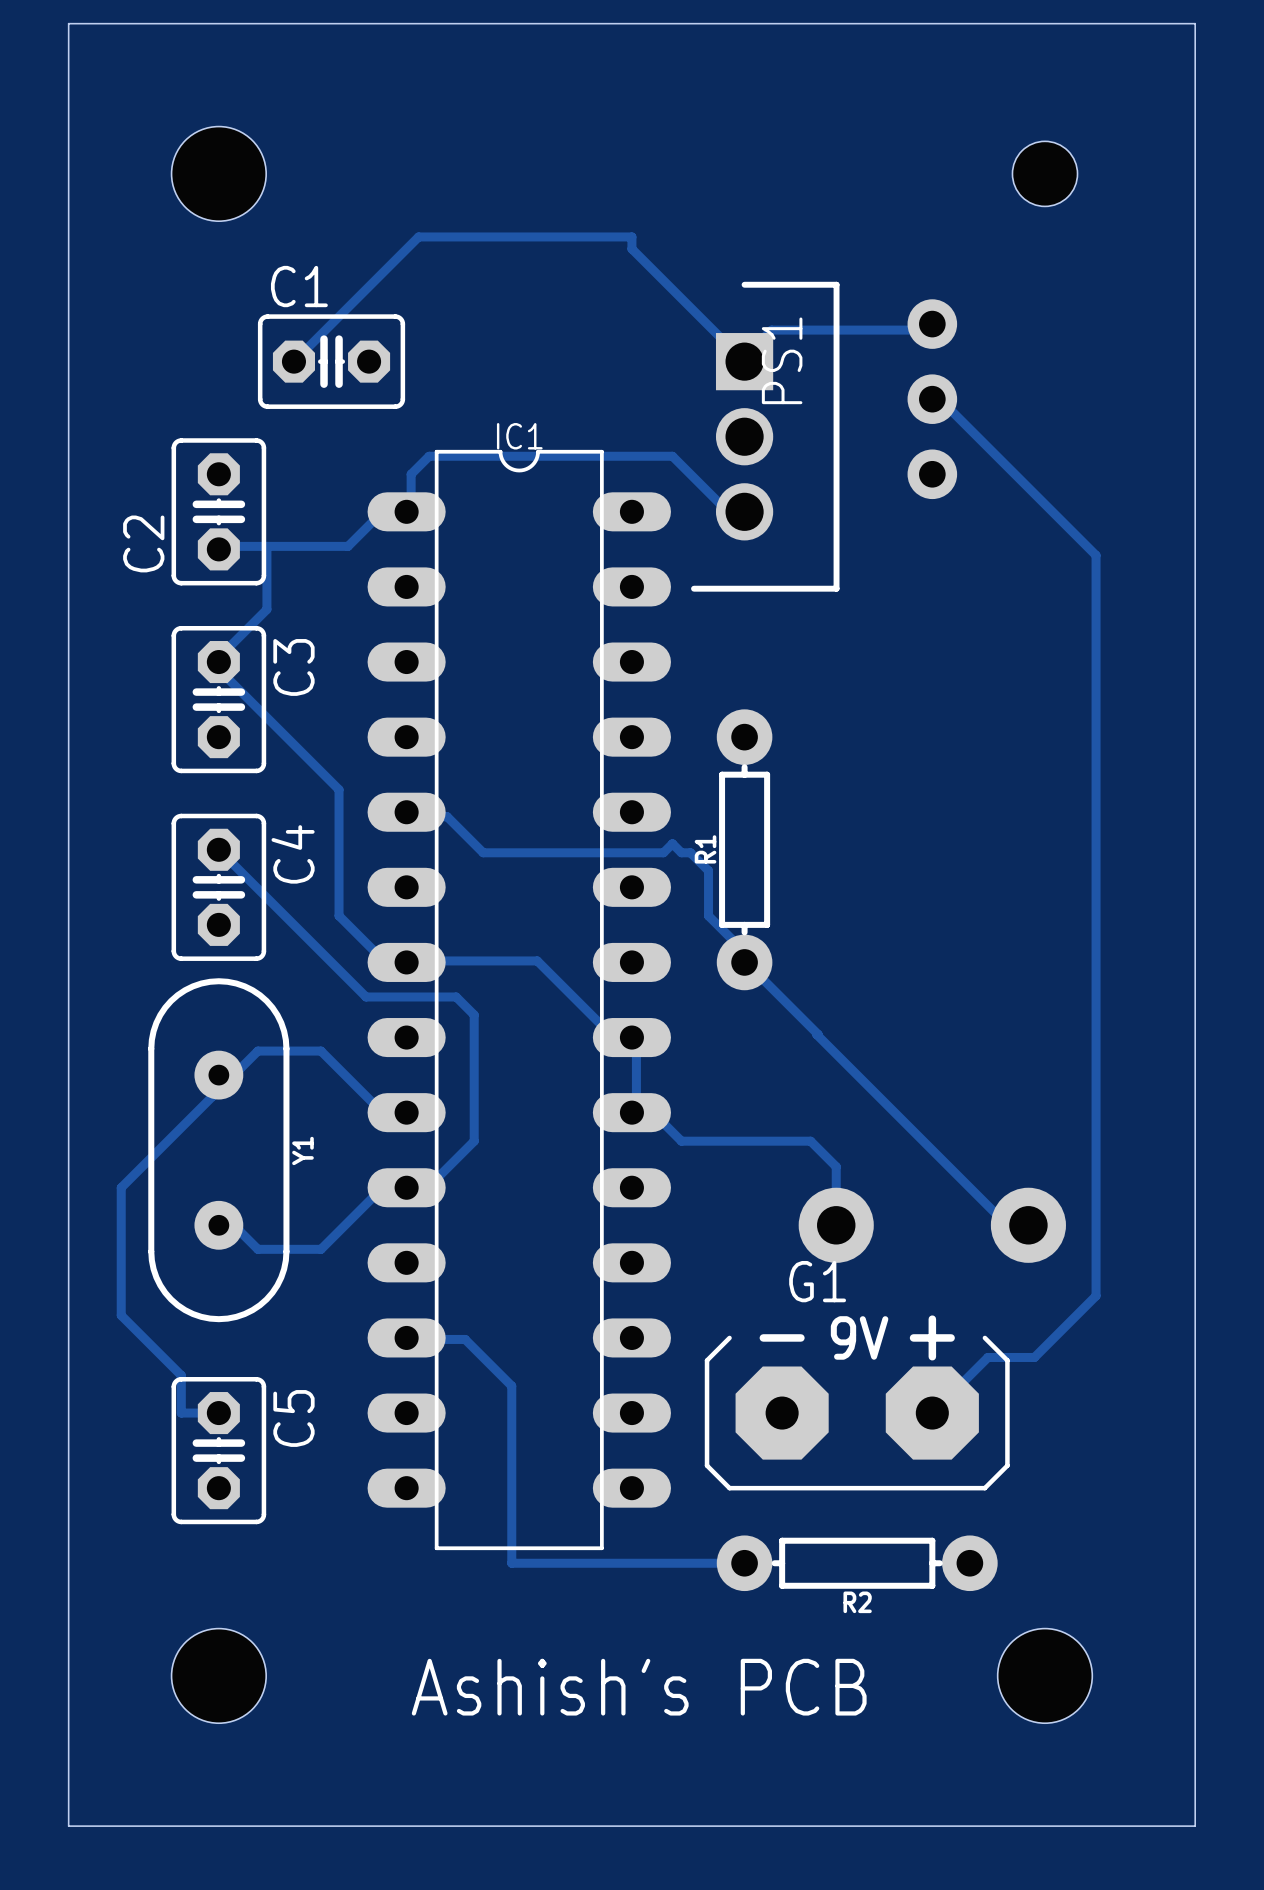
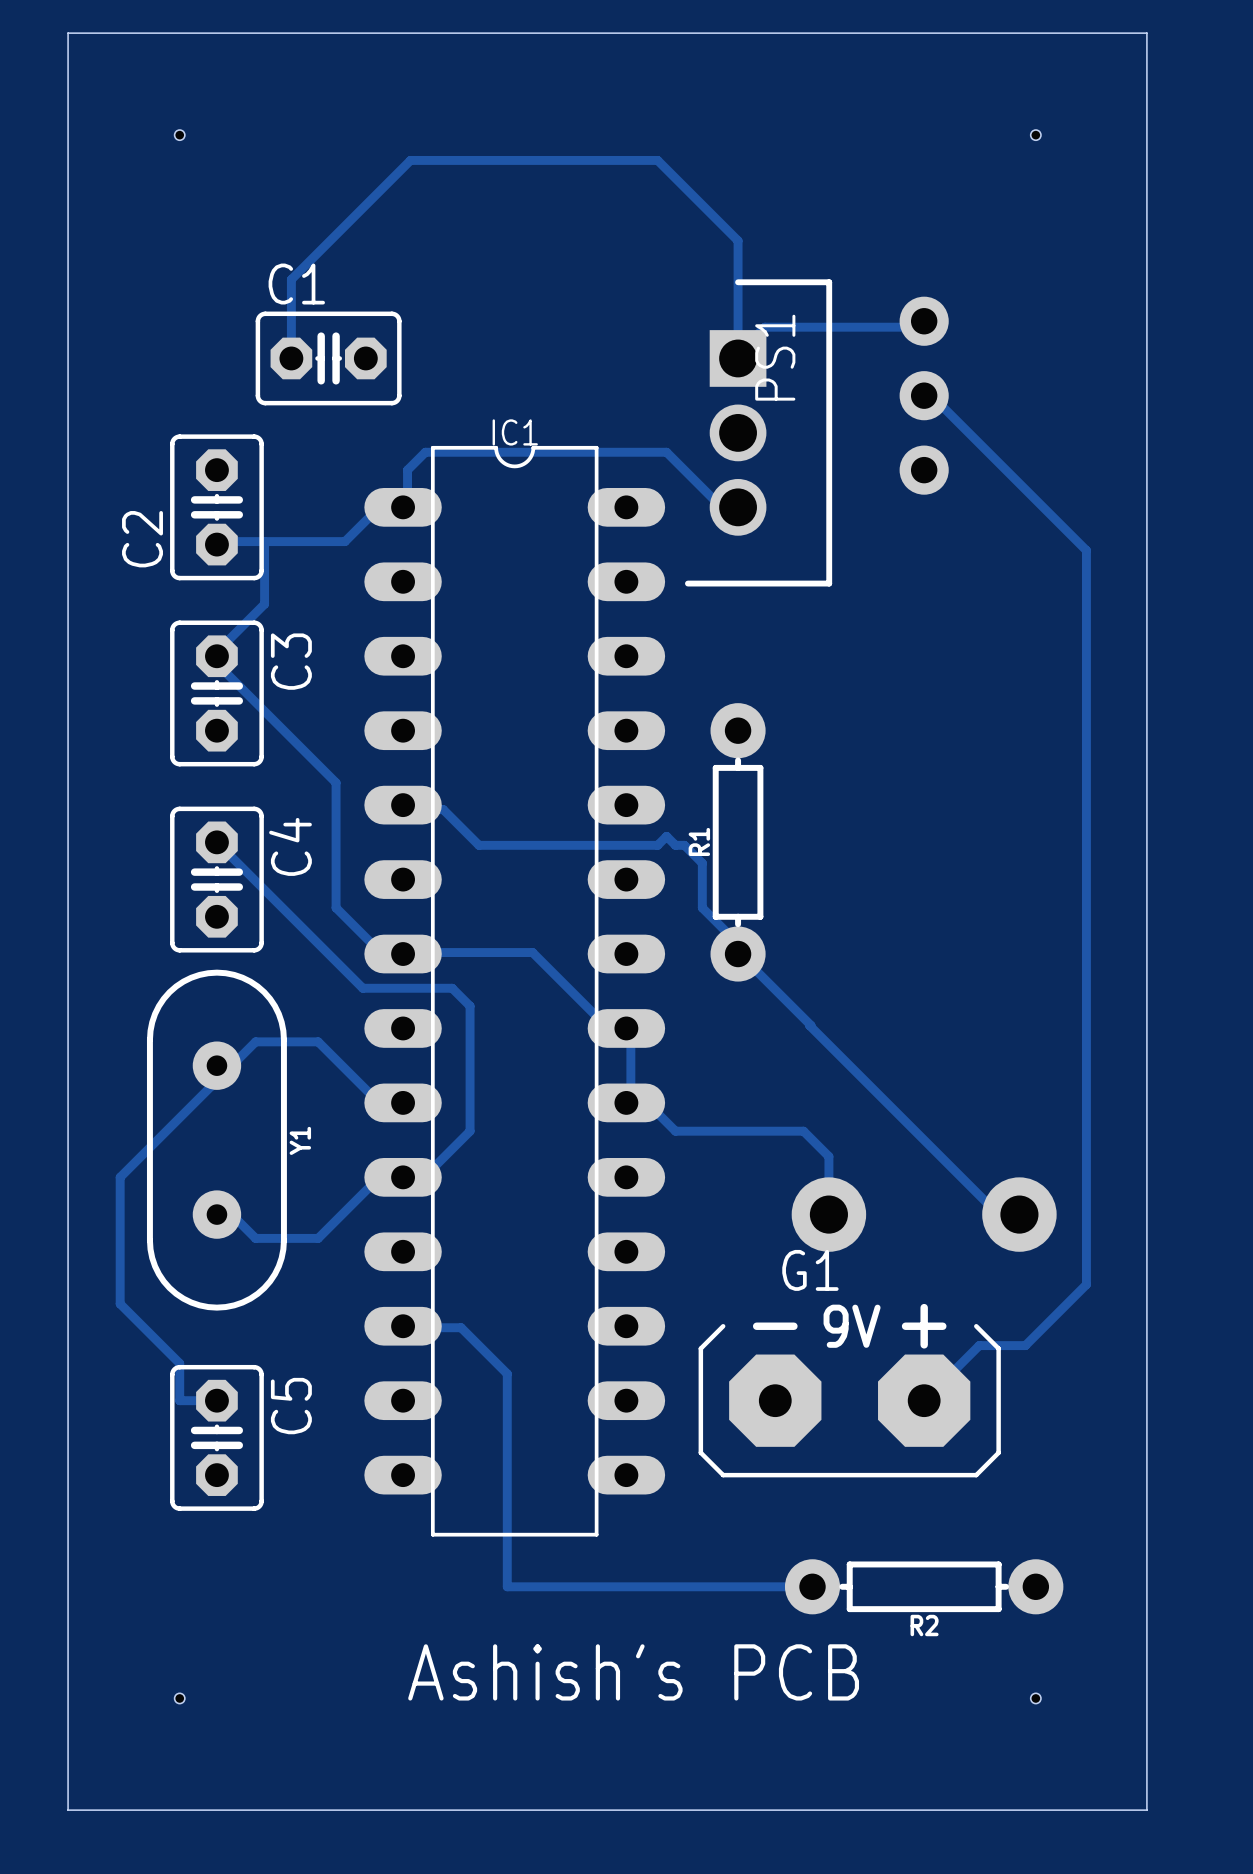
board edge: (68, 33) (68, 23) (1195, 23) (1195, 1826) (1157, 1826) -> (68, 33) (1146, 33) (1146, 1810)
hole: none -> (179, 135)
hole: none -> (1035, 135)
hole: (218, 173) -> none
hole: (1044, 173) -> none
track: (293, 361) (418, 236) (631, 236) (631, 248) (744, 361) -> (291, 358) (291, 279) (410, 160) (657, 160) (738, 240) (738, 354)
track: (511, 1563) (744, 1563) -> (507, 1549) (507, 1586) (812, 1586)
R2 position: (857, 1563) -> (924, 1586)
hole: (218, 1675) -> none
hole: (1044, 1675) -> none
hole: none -> (179, 1698)
hole: none -> (1035, 1698)

